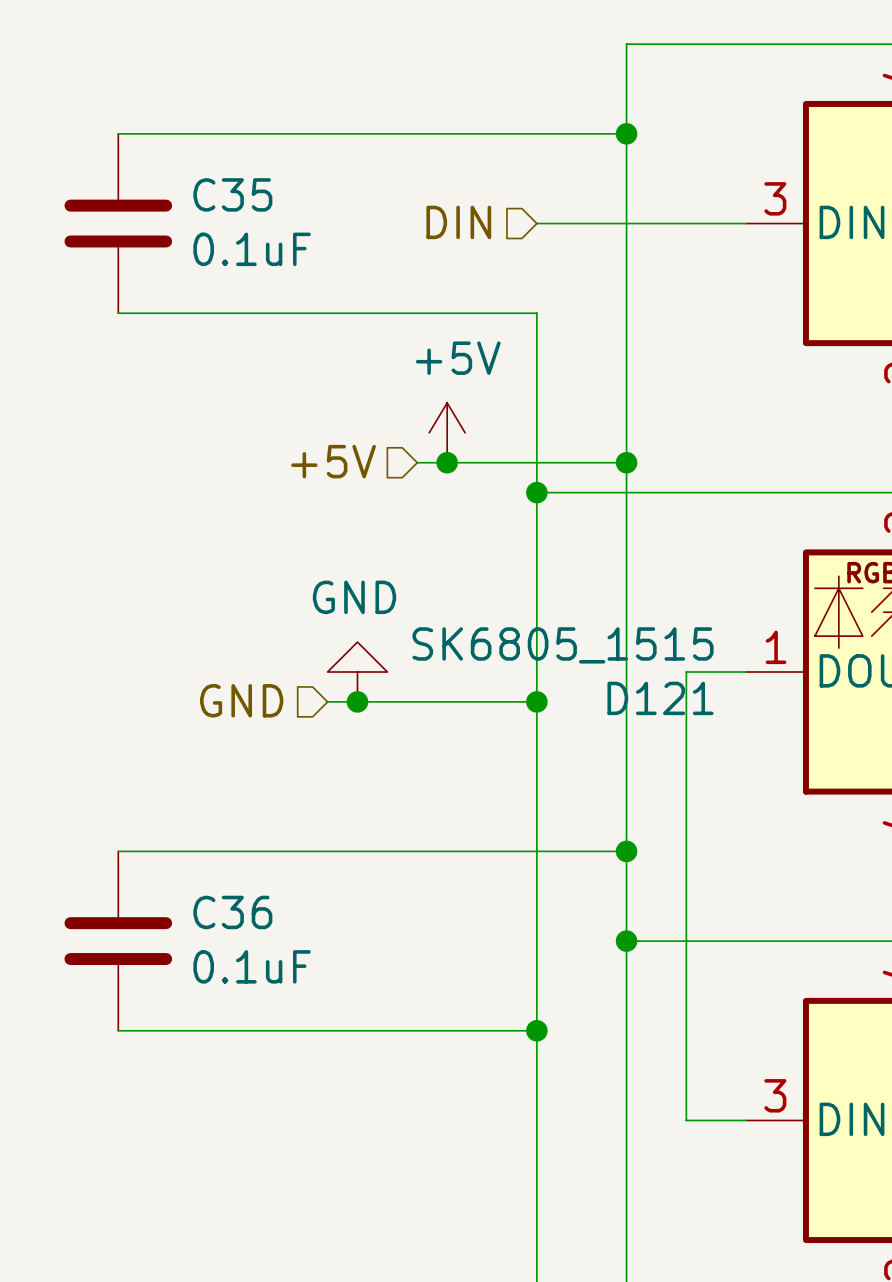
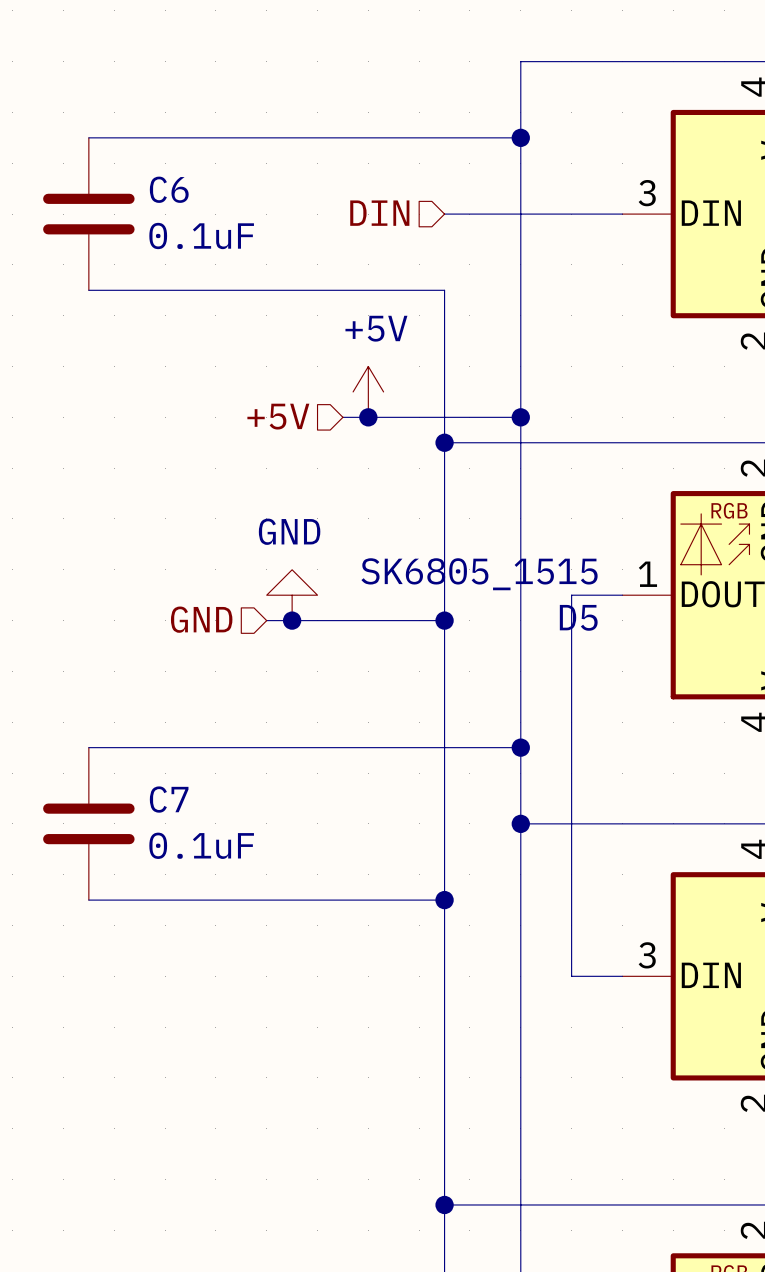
C35 name: C35 (232, 194) -> C6 (169, 189)
D121 name: D121 (660, 698) -> D5 (578, 617)
C36 name: C36 (232, 912) -> C7 (169, 799)

